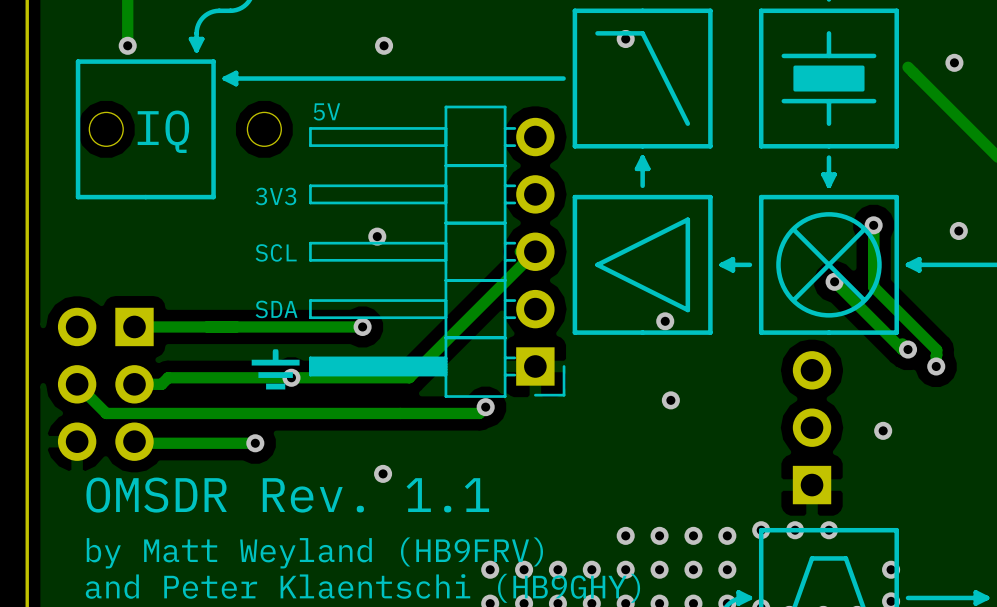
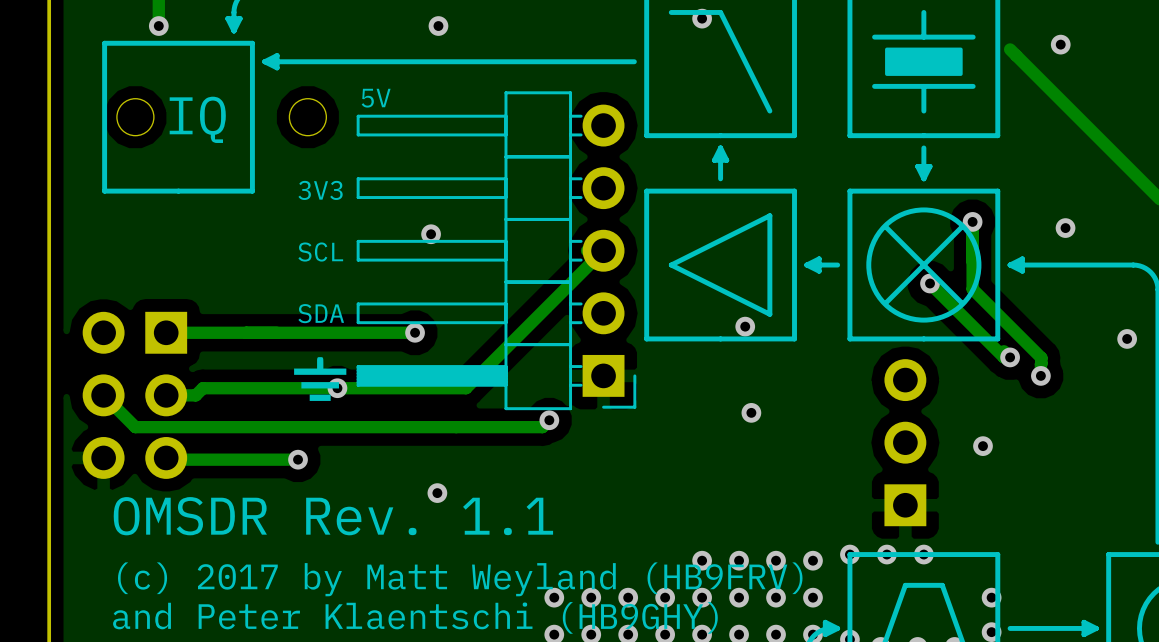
text: by Matt Weyland (HB9FRV) (314, 552) -> (c) 2017 by Matt Weyland (HB9FRV) (460, 579)

